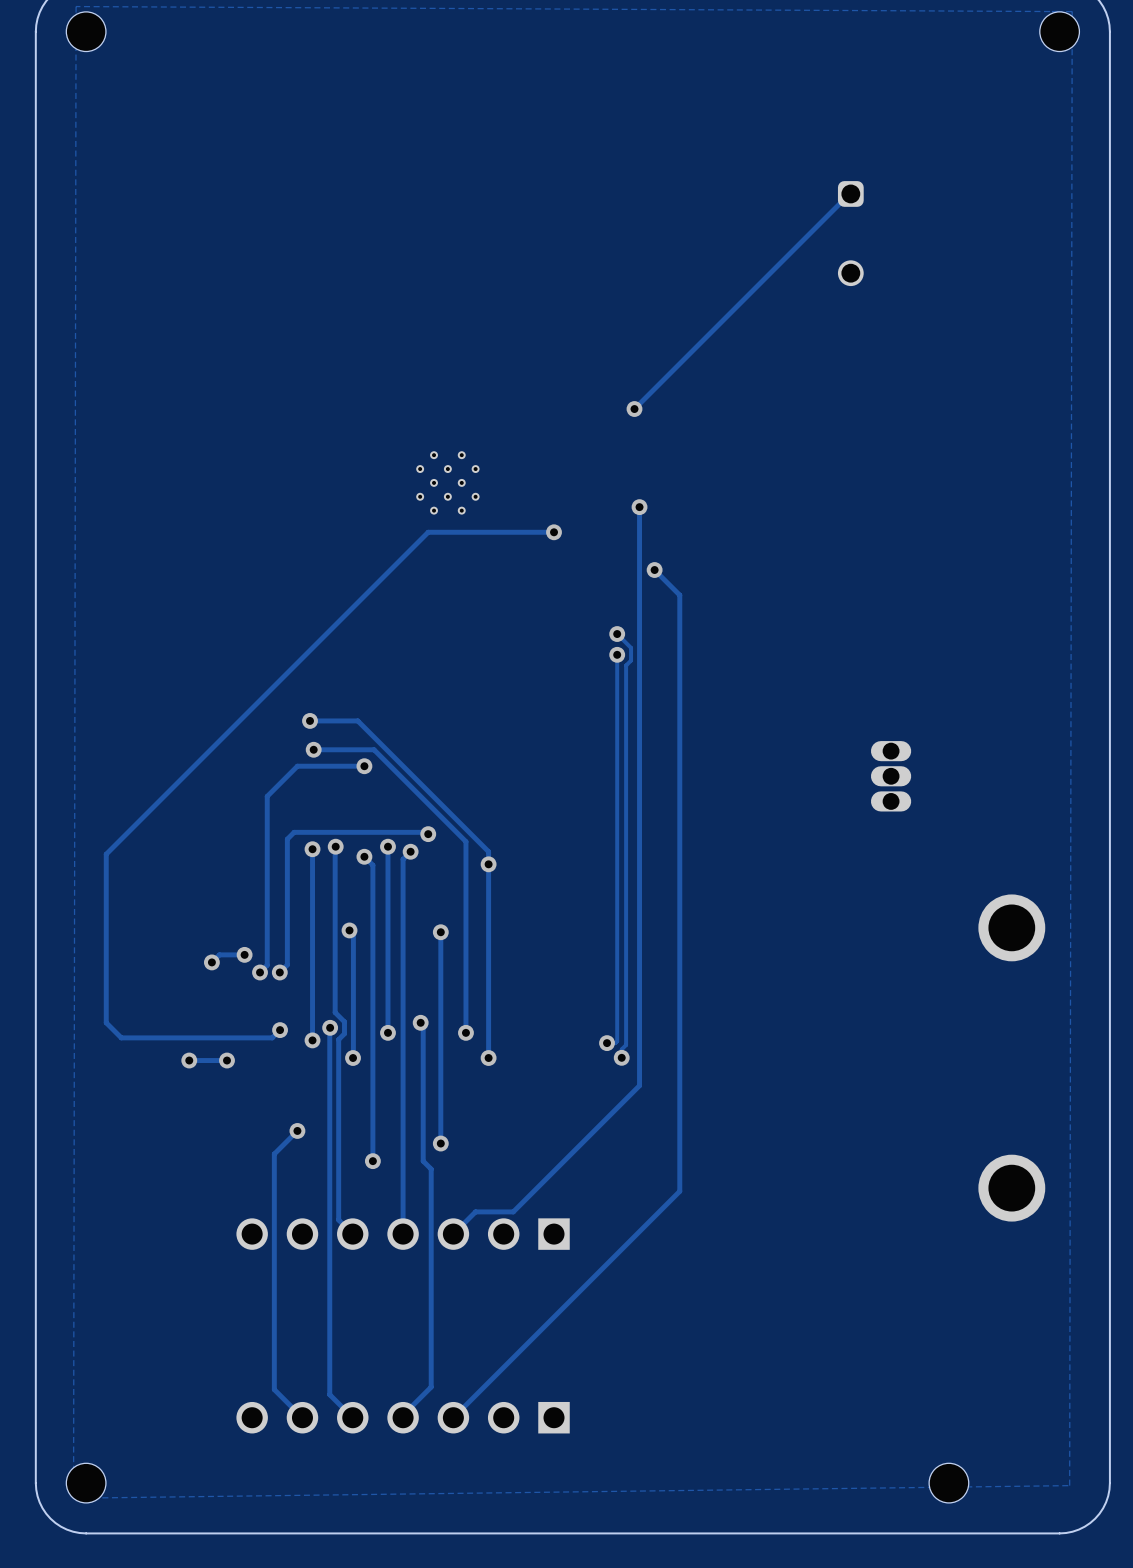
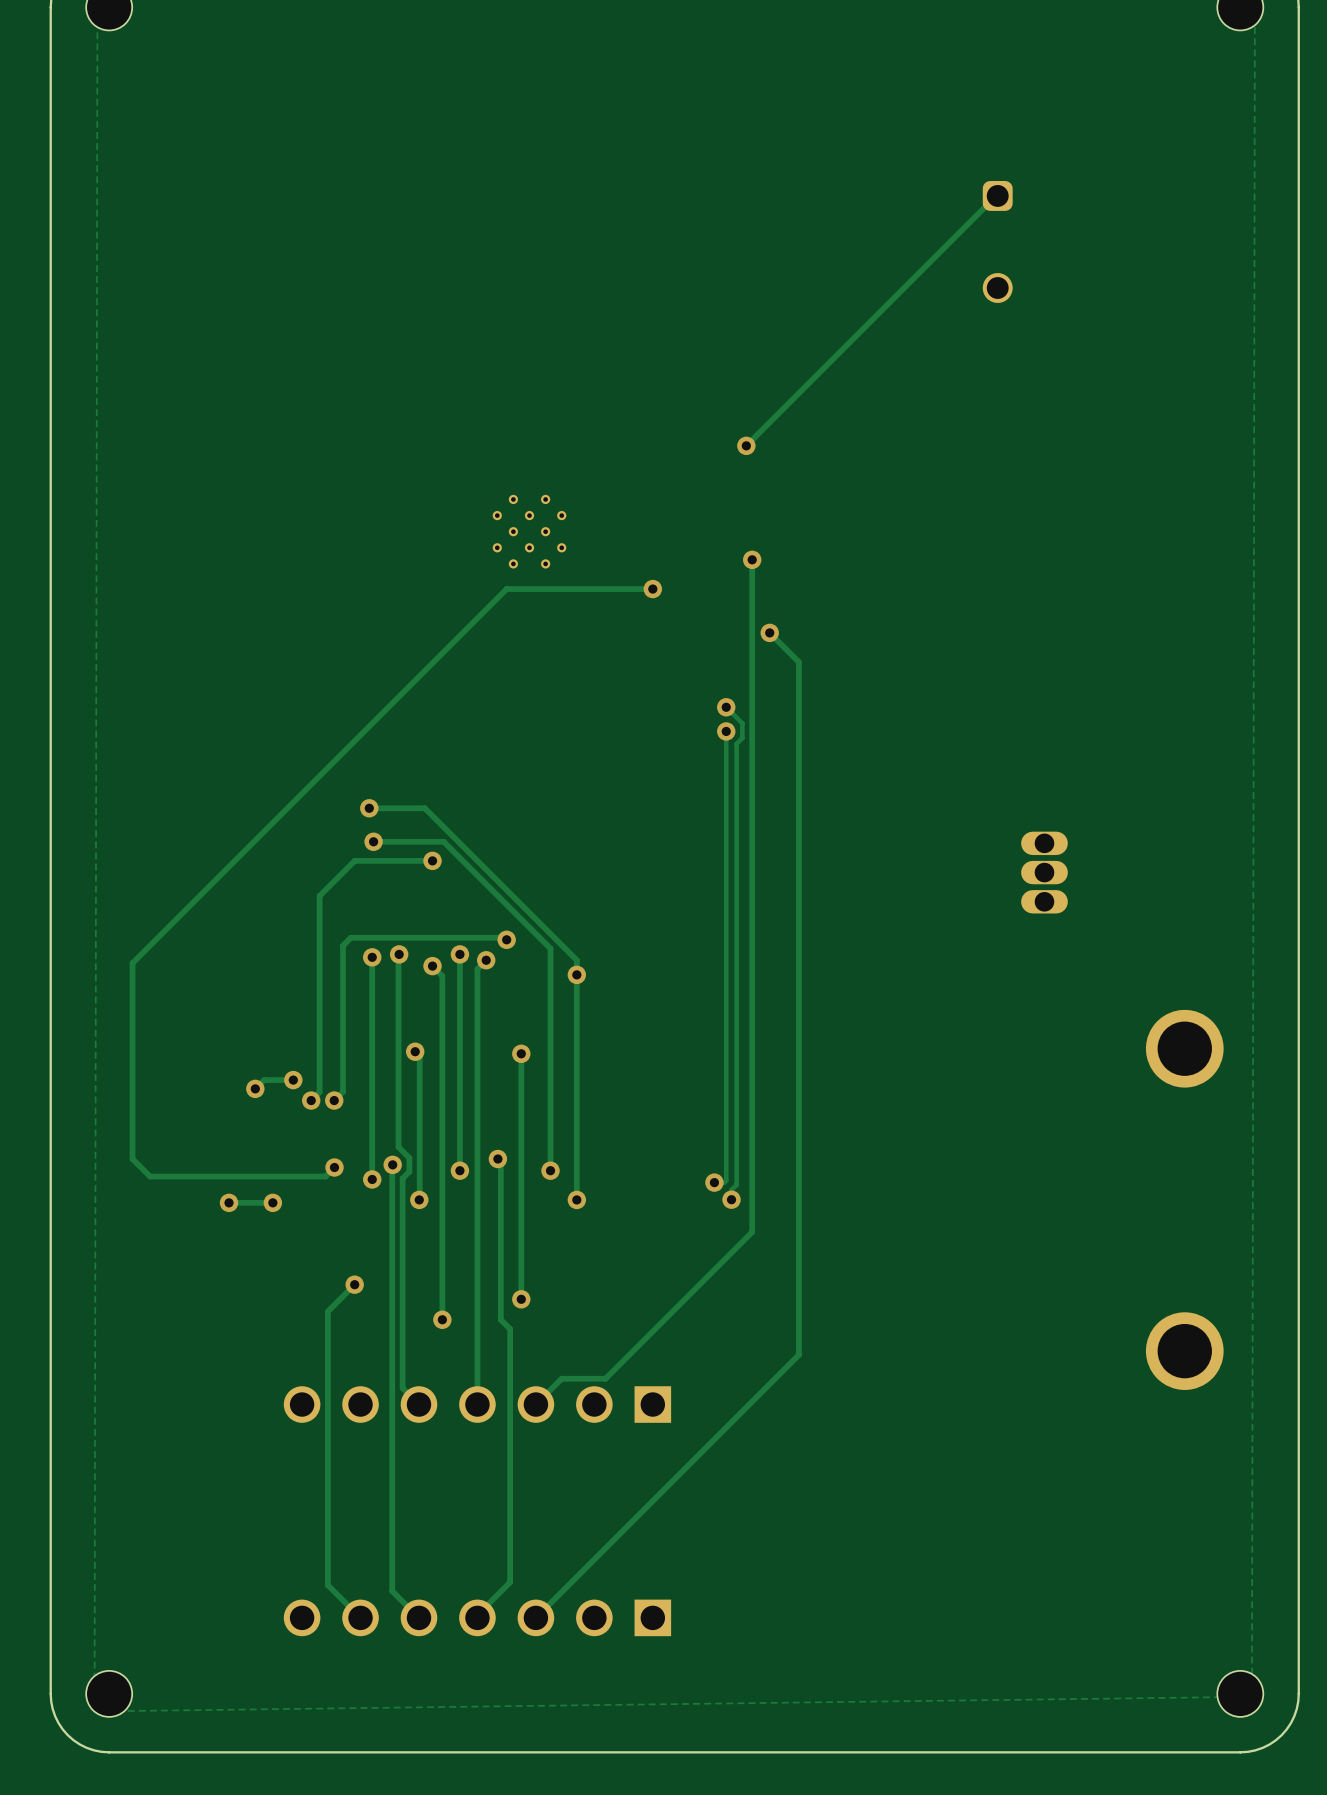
part position: (948, 1483) -> (1240, 1693)

